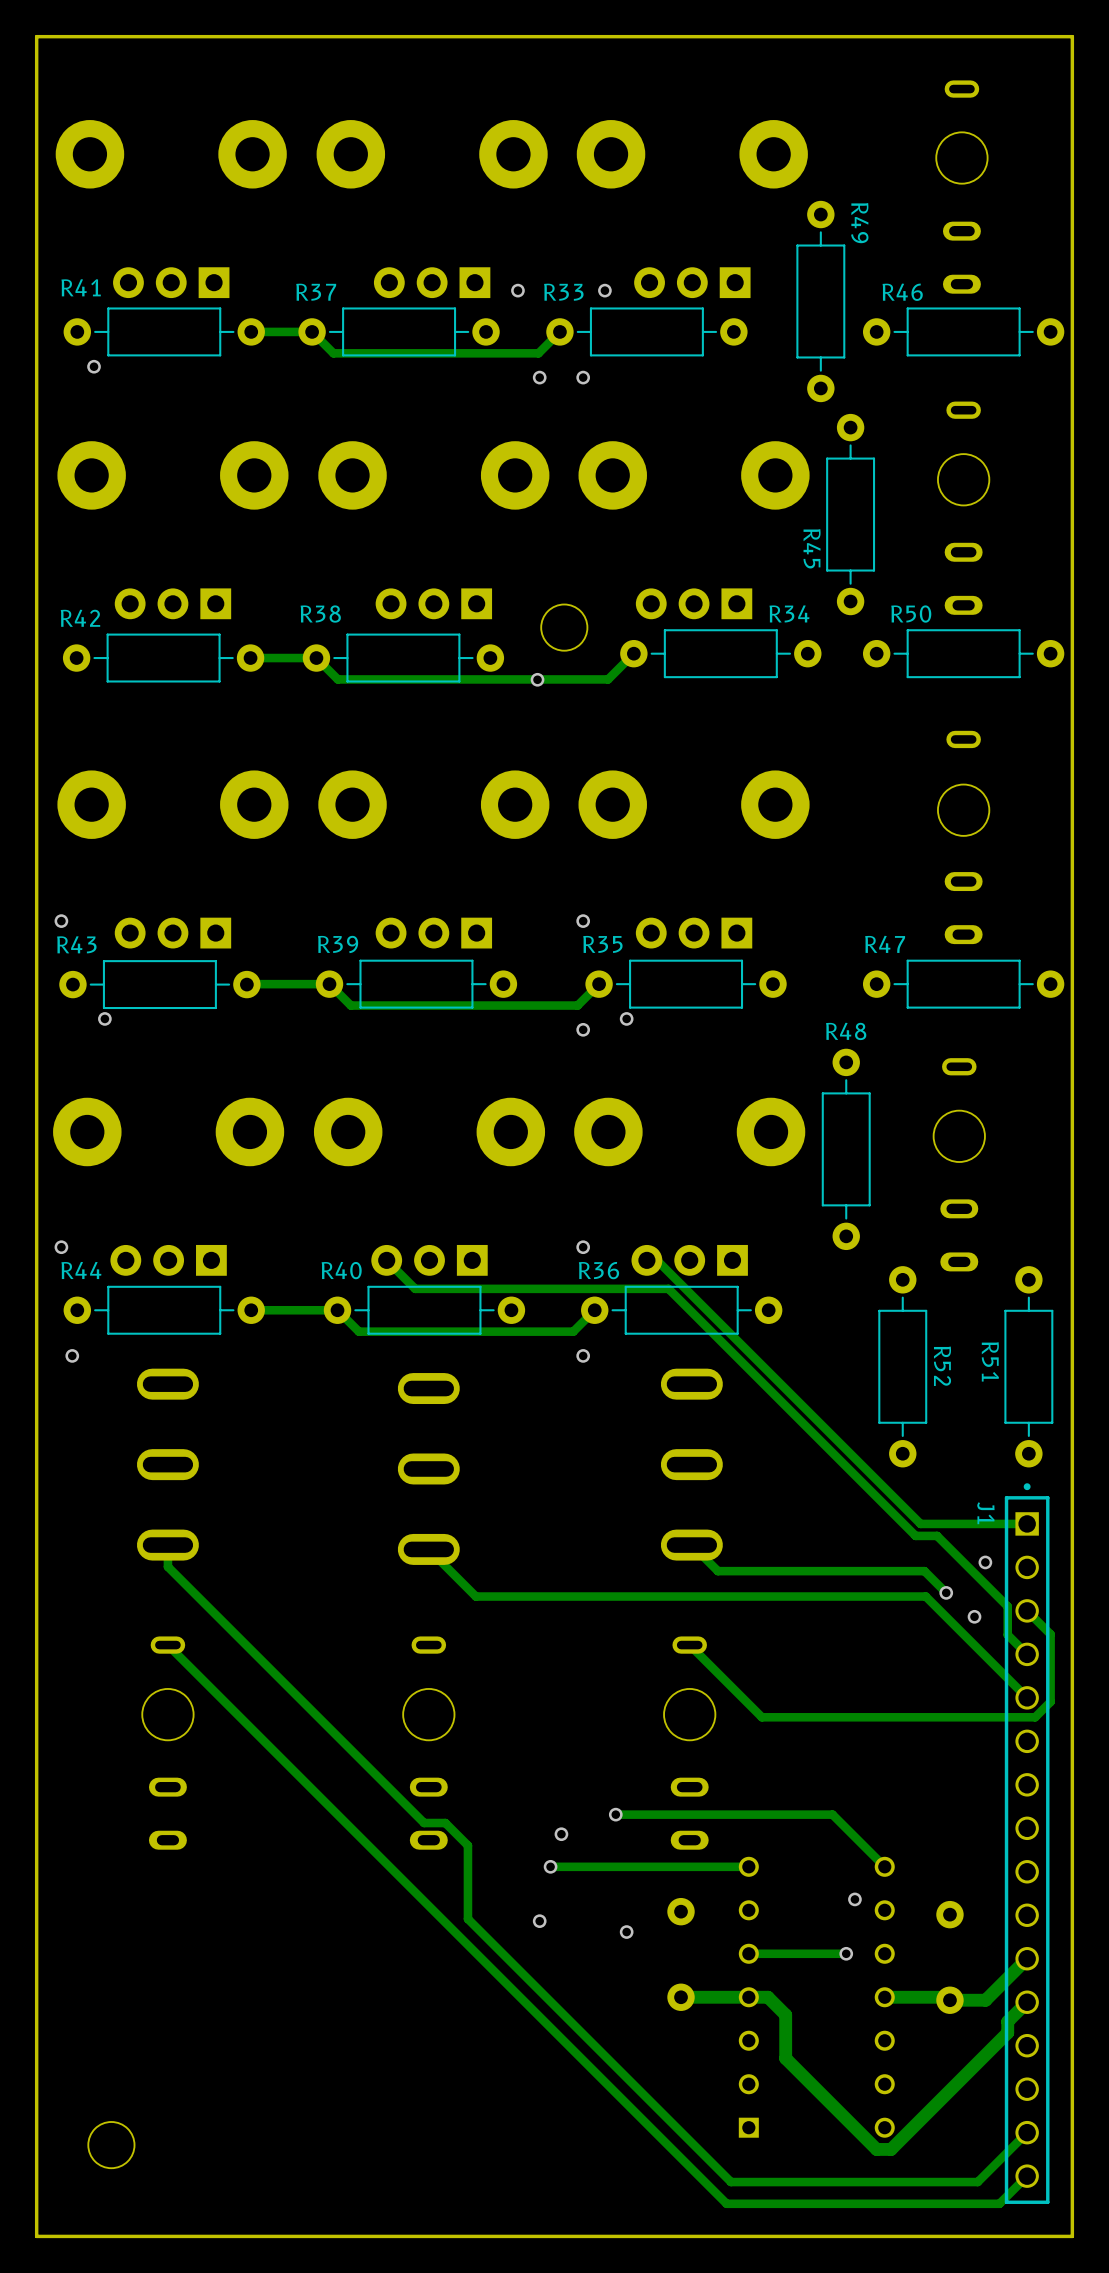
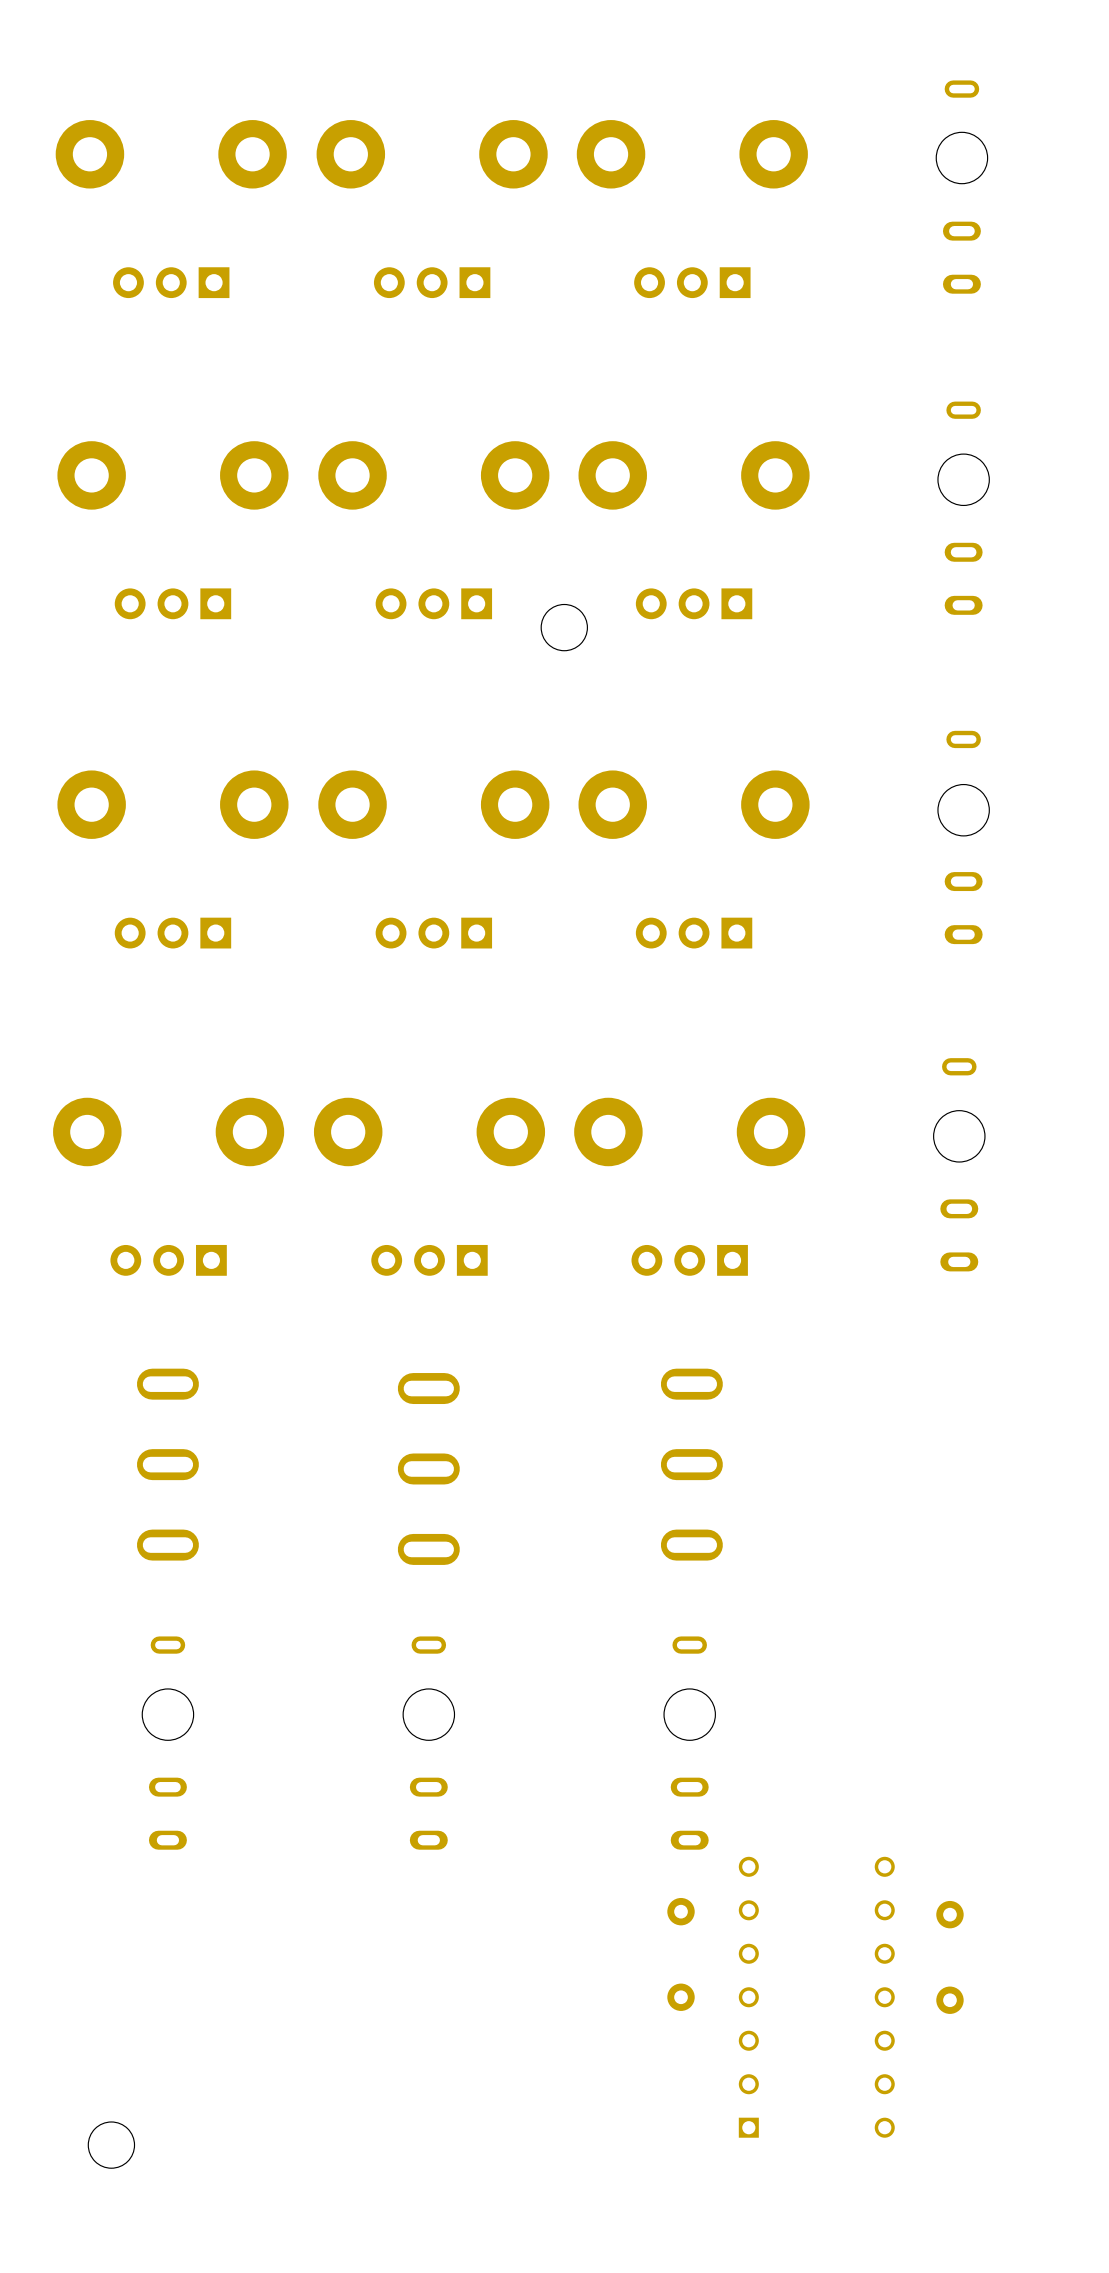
board edge: (1072, 36) (36, 36) (36, 2236) (1072, 2236) (1072, 36) -> none
via: (517, 290) -> none
via: (604, 290) -> none
R49: (820, 301) -> none
R41: (164, 331) -> none
R37: (399, 331) -> none
track: (559, 331) (538, 353) (333, 353) (312, 331) (251, 331) -> none
R33: (646, 331) -> none
R46: (963, 331) -> none
via: (94, 366) -> none
via: (539, 377) -> none
via: (583, 377) -> none
R45: (850, 514) -> none
track: (633, 653) (608, 679) (337, 679) (316, 658) (250, 658) -> none
R34: (720, 653) -> none
R50: (963, 653) -> none
R42: (163, 658) -> none
R38: (403, 658) -> none
via: (537, 679) -> none
via: (61, 921) -> none
via: (583, 921) -> none
R43: (159, 984) -> none
R39: (416, 984) -> none
track: (599, 984) (577, 1005) (350, 1005) (329, 984) (246, 984) -> none
R35: (686, 984) -> none
R47: (963, 984) -> none
via: (104, 1018) -> none
via: (626, 1018) -> none
via: (583, 1029) -> none
R48: (846, 1149) -> none
via: (61, 1247) -> none
via: (583, 1247) -> none
track: (386, 1260) (415, 1288) (668, 1288) (915, 1535) (937, 1535) (1007, 1606) (1007, 1634) (1027, 1654) -> none
track: (646, 1260) (657, 1260) (920, 1523) (1027, 1523) -> none
R44: (164, 1310) -> none
R40: (424, 1310) -> none
track: (594, 1310) (573, 1331) (358, 1331) (337, 1310) (251, 1310) -> none
R36: (681, 1310) -> none
via: (72, 1355) -> none
via: (583, 1355) -> none
R52: (902, 1366) -> none
R51: (1028, 1366) -> none
track: (689, 1547) (691, 1545) (717, 1571) (924, 1571) (946, 1592) -> none
track: (428, 1549) (475, 1596) (925, 1596) (1027, 1697) -> none
track: (167, 1555) (167, 1566) (424, 1823) (445, 1823) (467, 1845) (467, 1918) (731, 2182) (977, 2182) (1027, 2132) -> none
via: (985, 1562) -> none
via: (946, 1592) -> none
track: (1027, 1610) (1050, 1634) (1050, 1701) (1035, 1717) (761, 1717) (689, 1645) -> none
via: (974, 1616) -> none
track: (167, 1645) (726, 2203) (999, 2203) (1027, 2176) -> none
track: (615, 1814) (832, 1814) (884, 1866) -> none
via: (615, 1814) -> none
via: (561, 1834) -> none
J1: (1027, 1843) -> none
via: (550, 1866) -> none
track: (748, 1866) (550, 1866) -> none
via: (854, 1899) -> none
via: (539, 1921) -> none
via: (626, 1932) -> none
track: (846, 1953) (748, 1953) -> none
via: (846, 1953) -> none
track: (1027, 1958) (985, 2000) (949, 2000) (946, 1997) (884, 1997) -> none
track: (681, 1997) (767, 1997) (785, 2014) (785, 2058) (876, 2149) (891, 2149) (1007, 2032) (1007, 2021) (1027, 2002) -> none

